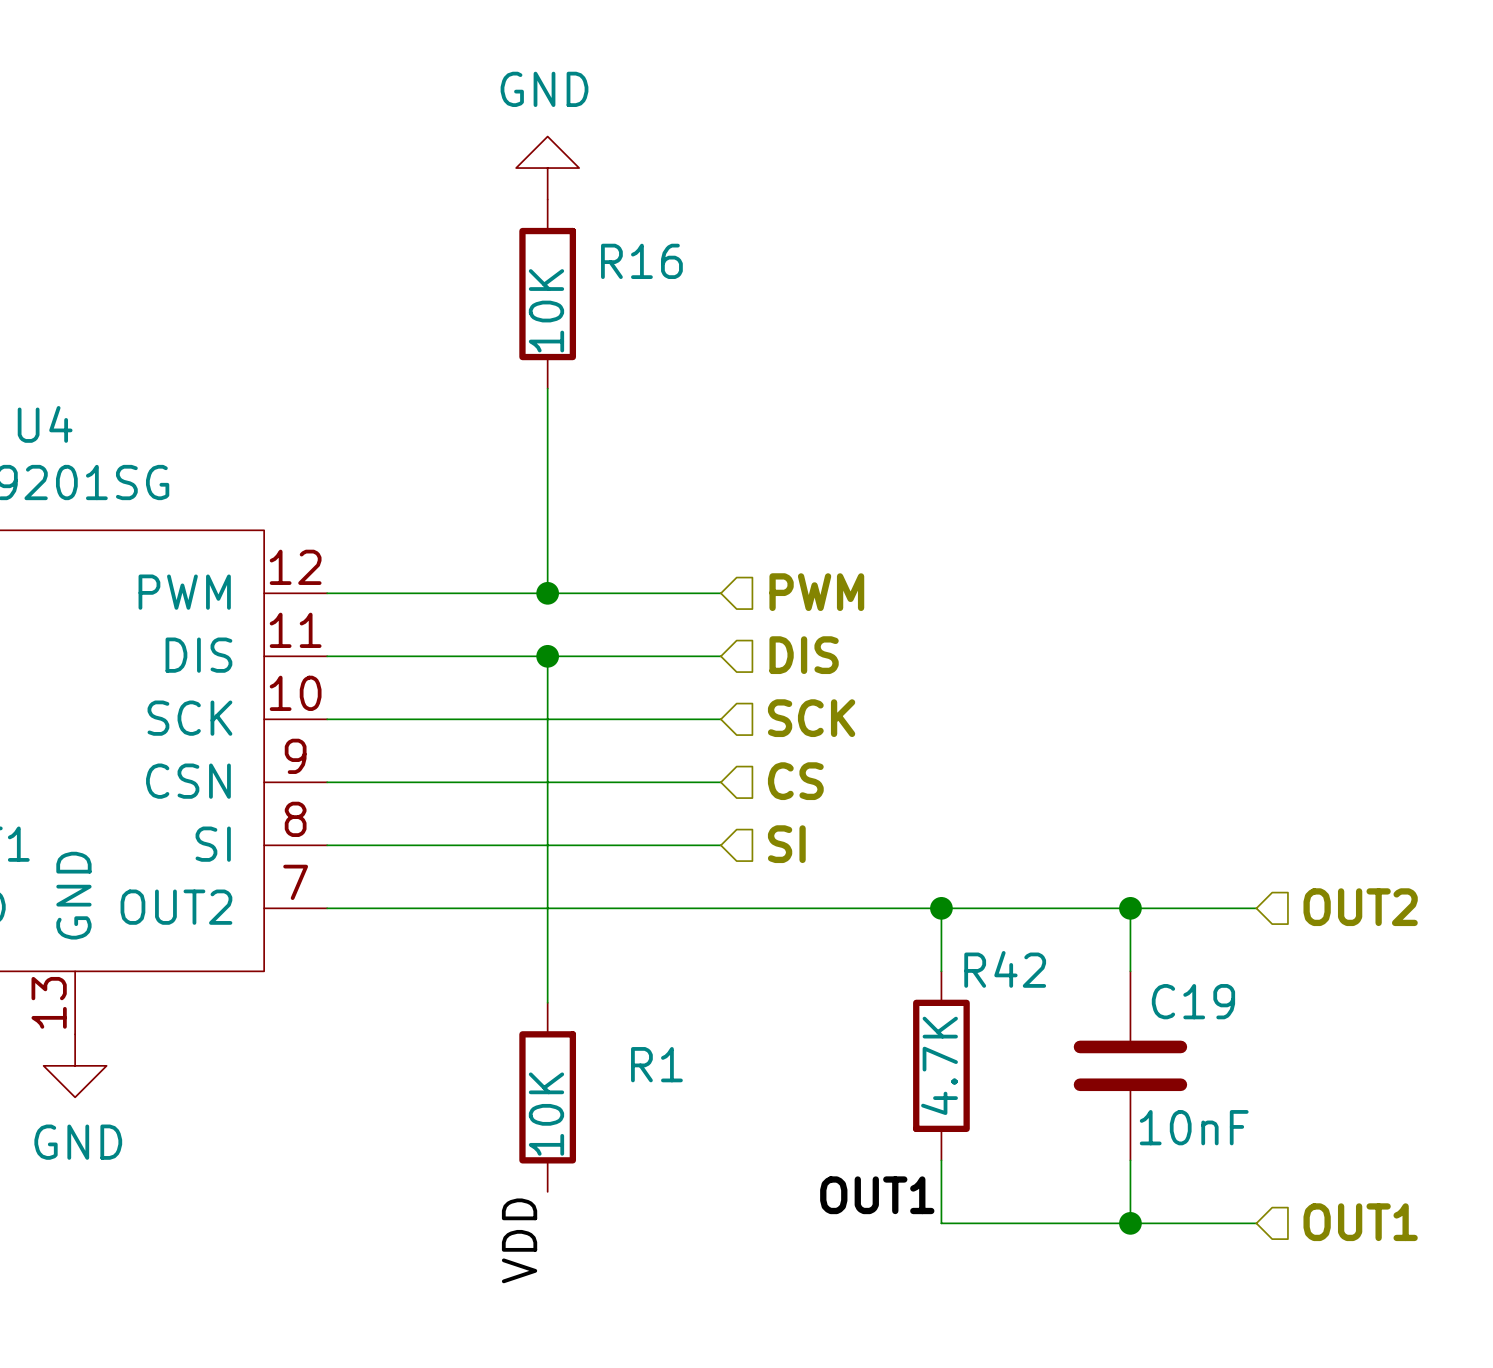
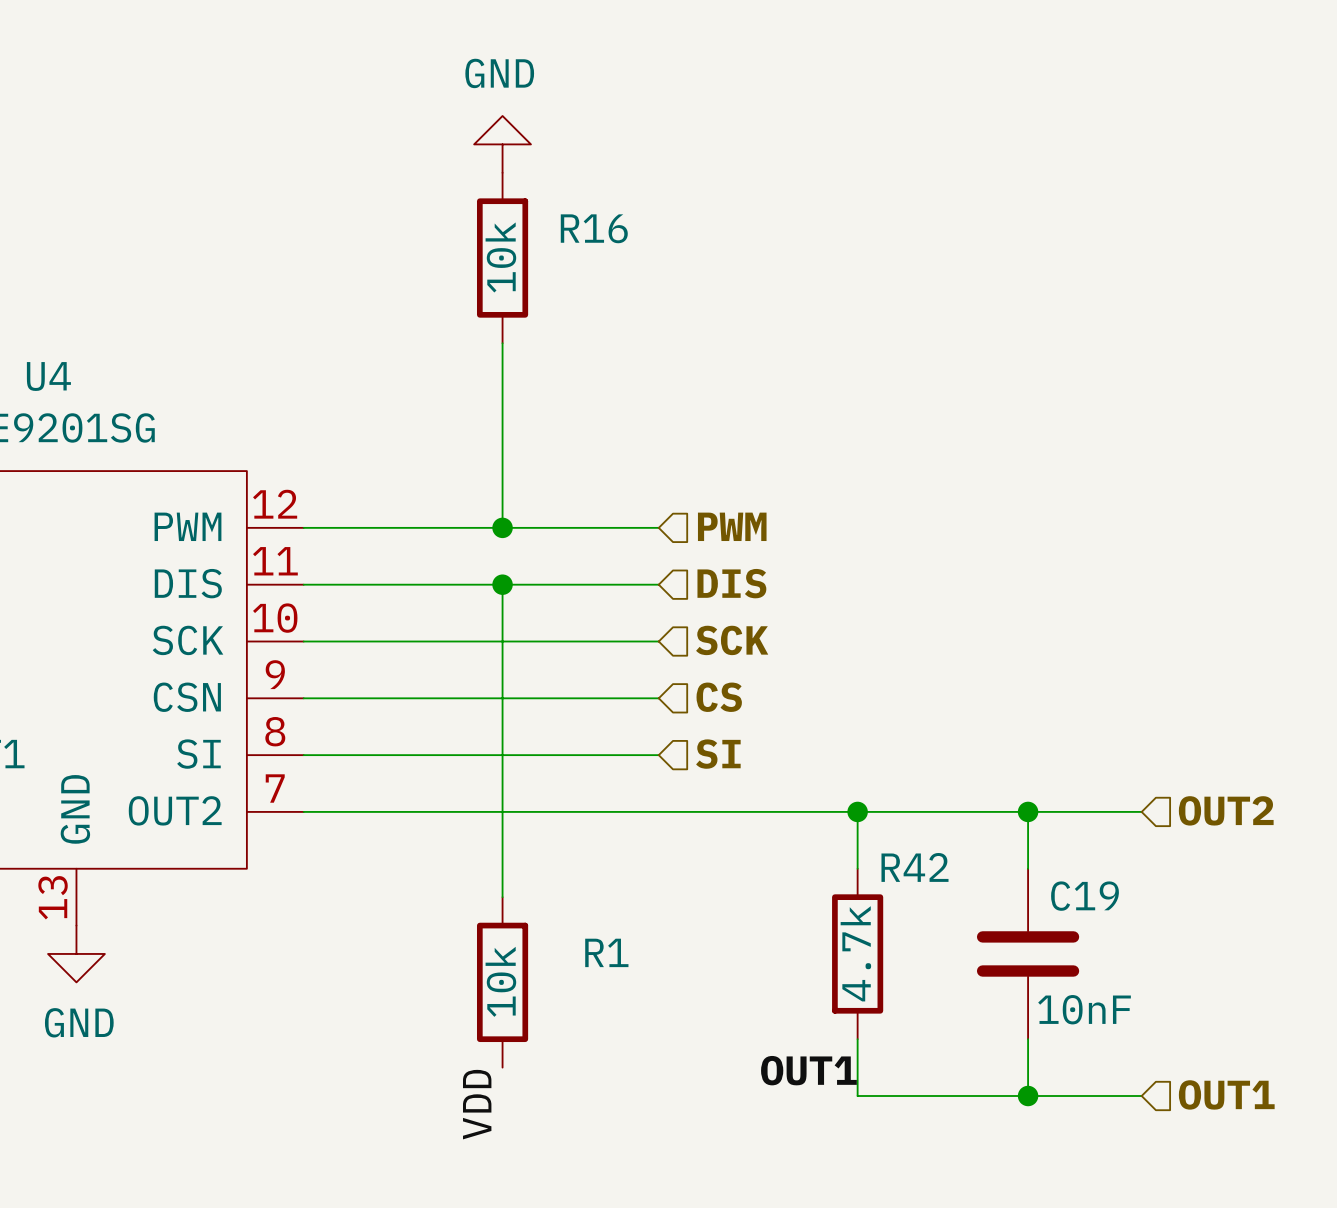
R16 value: 10K (546, 310) -> 10k (500, 257)
R42 value: 4.7K (939, 1065) -> 4.7k (855, 953)
R1 value: 10K (546, 1114) -> 10k (500, 981)

